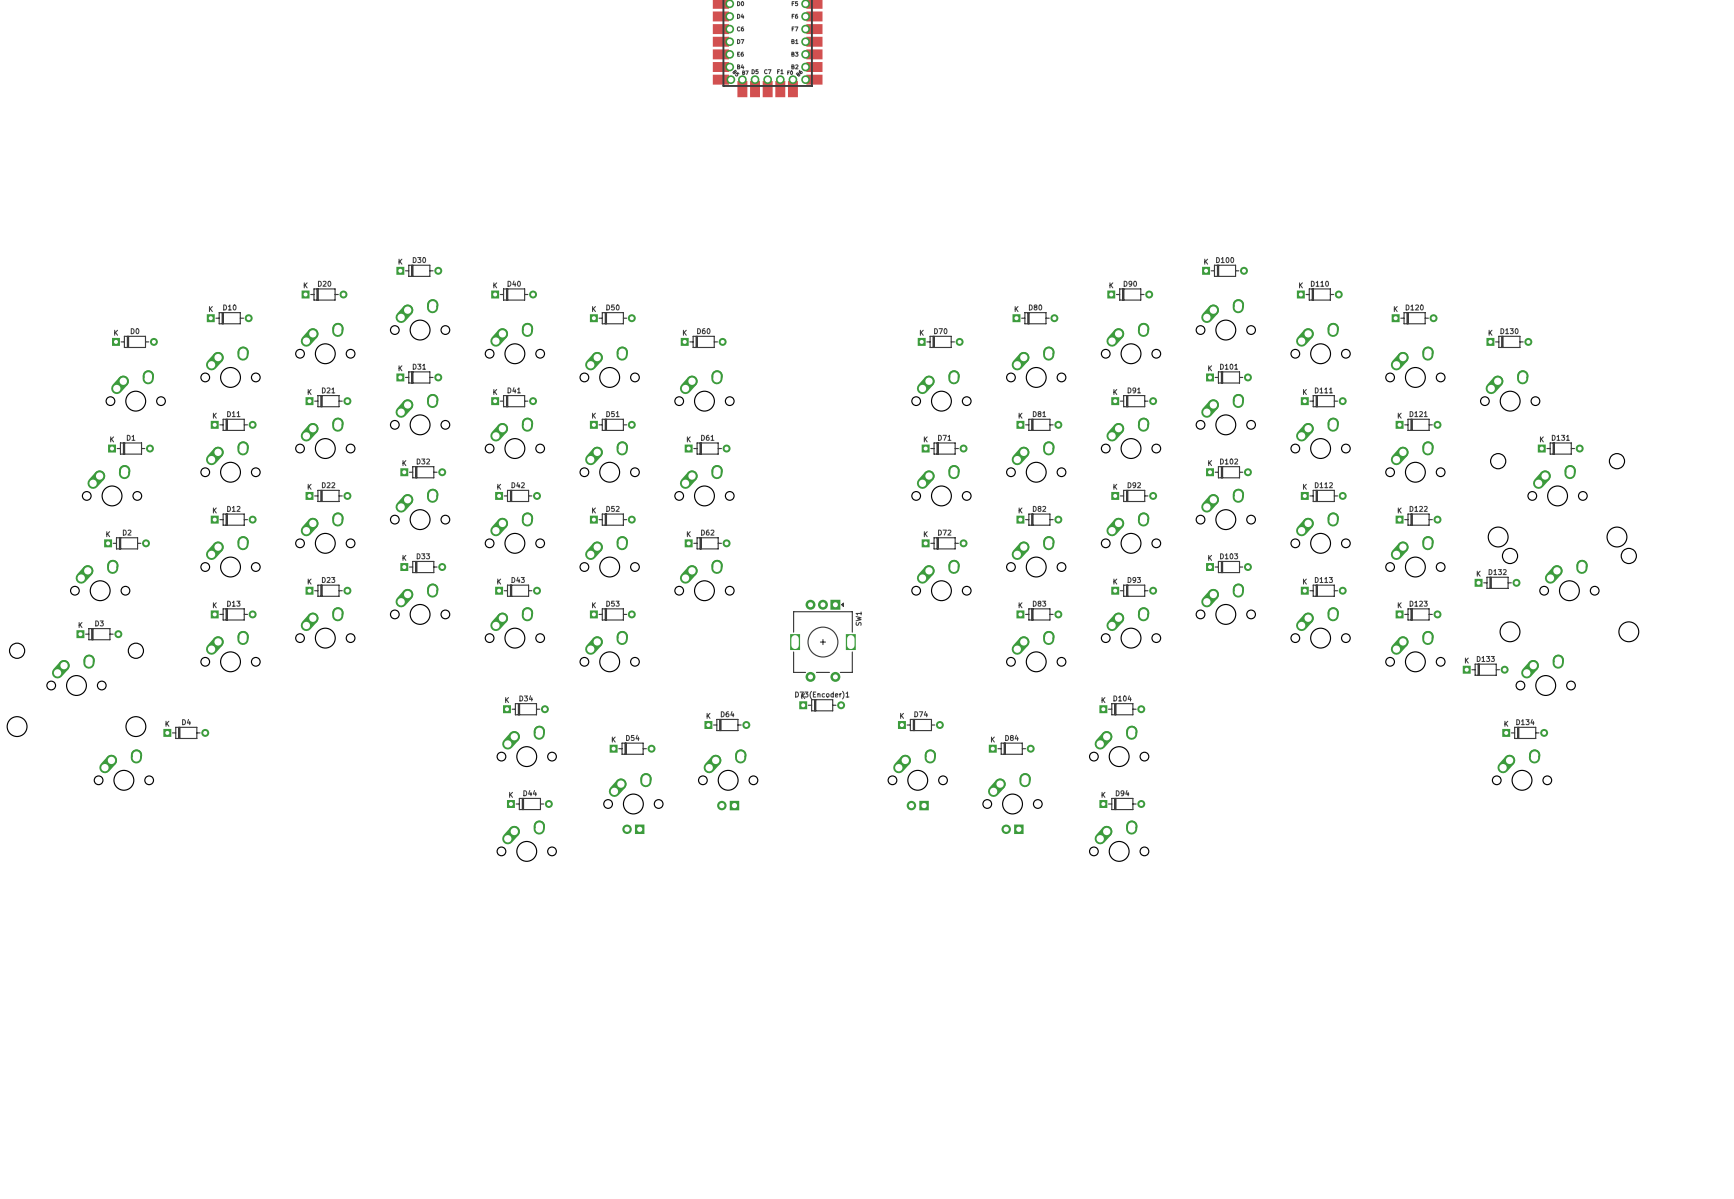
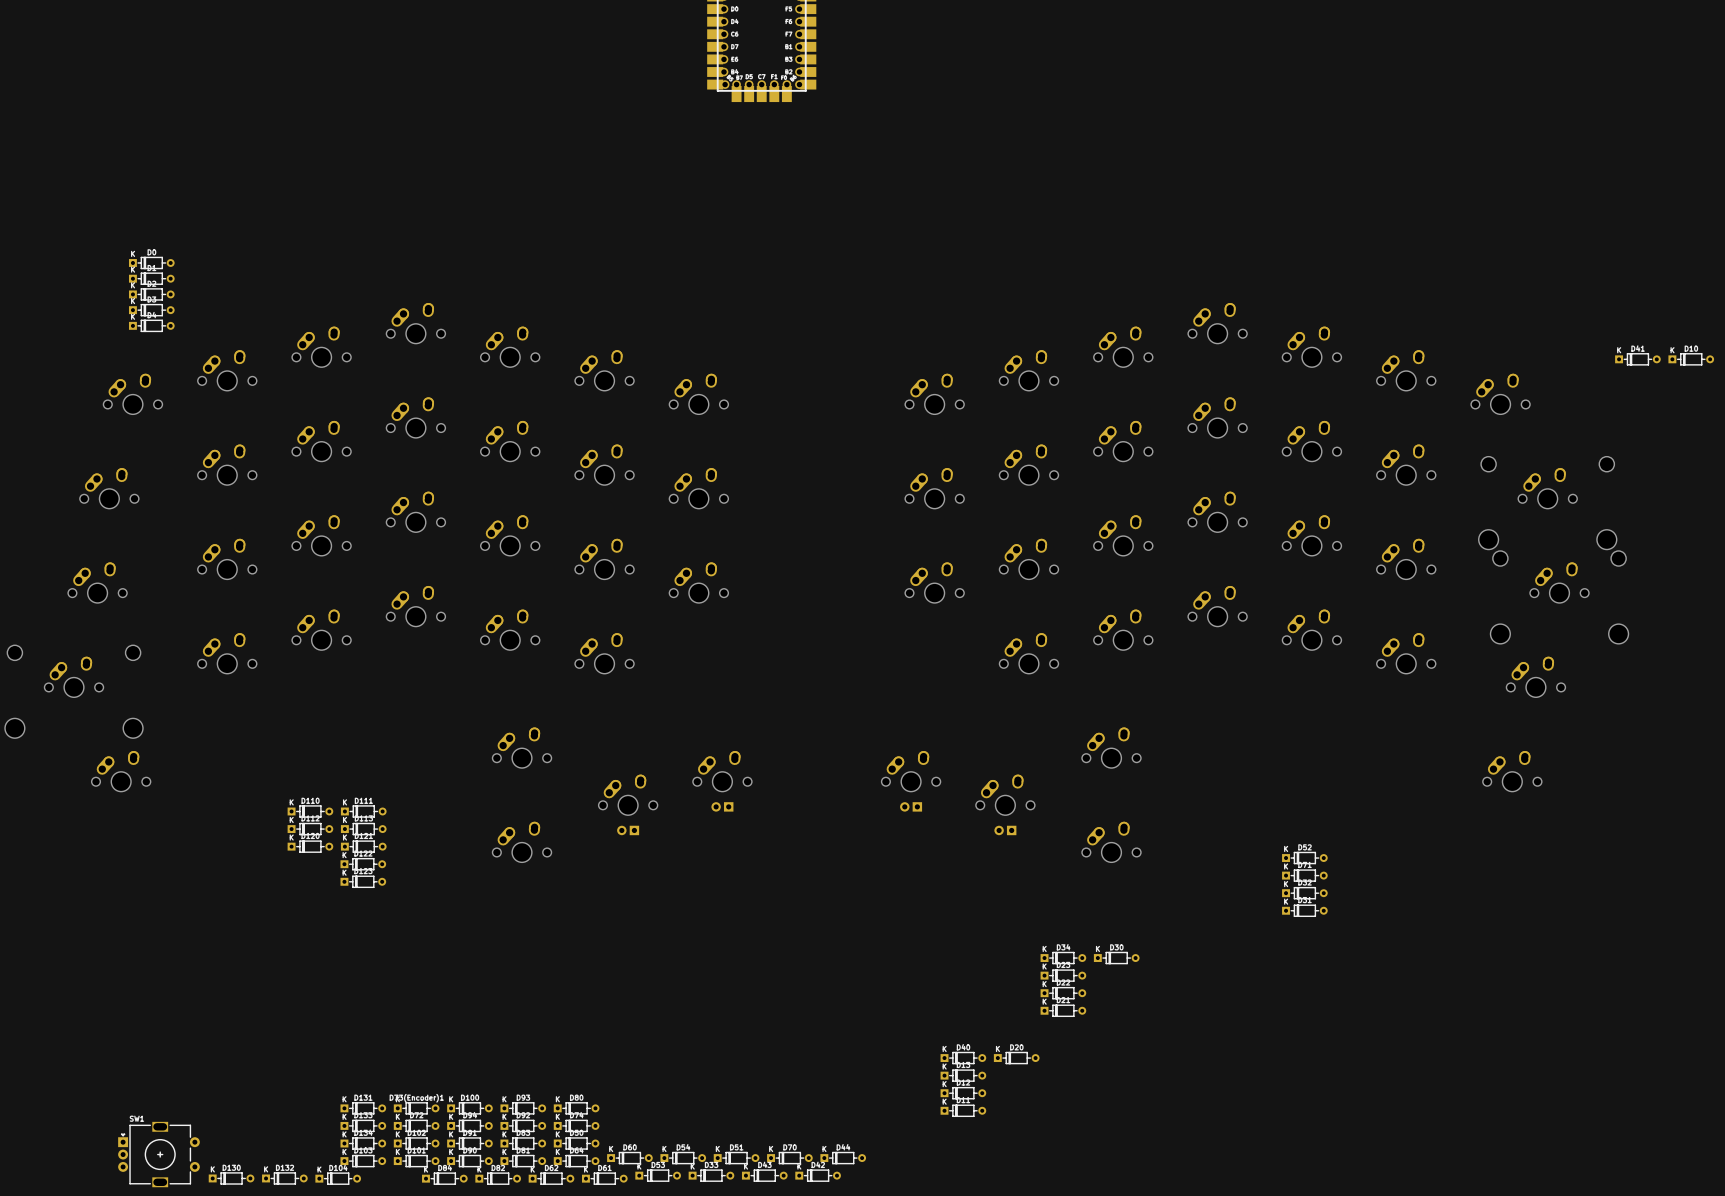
part position: (419, 270) -> (1116, 958)
part position: (1225, 270) -> (469, 1108)
part position: (324, 294) -> (1016, 1058)
part position: (514, 294) -> (963, 1058)
part position: (1130, 294) -> (469, 1161)
part position: (1319, 294) -> (310, 811)
part position: (229, 318) -> (1691, 359)
part position: (612, 318) -> (576, 1143)
part position: (1035, 318) -> (576, 1108)
part position: (1414, 318) -> (310, 846)
part position: (134, 341) -> (151, 262)
part position: (703, 341) -> (629, 1158)
part position: (940, 341) -> (789, 1158)
part position: (1509, 341) -> (231, 1178)
part position: (419, 377) -> (1304, 910)
part position: (1228, 377) -> (416, 1161)
part position: (328, 401) -> (1063, 1010)
part position: (514, 401) -> (1637, 359)
part position: (1134, 401) -> (469, 1143)
part position: (1323, 401) -> (363, 811)
part position: (233, 424) -> (963, 1110)
part position: (612, 424) -> (736, 1158)
part position: (1039, 424) -> (523, 1161)
part position: (1418, 424) -> (363, 846)
part position: (130, 448) -> (151, 278)
part position: (707, 448) -> (604, 1178)
part position: (944, 448) -> (1304, 875)
part position: (1560, 448) -> (363, 1108)
part position: (423, 472) -> (1304, 893)
part position: (1228, 472) -> (416, 1143)
part position: (328, 495) -> (1063, 993)
part position: (518, 495) -> (818, 1175)
part position: (1134, 495) -> (523, 1125)
part position: (1323, 495) -> (310, 829)
part position: (233, 519) -> (963, 1093)
part position: (612, 519) -> (1304, 858)
part position: (1039, 519) -> (498, 1178)
part position: (1418, 519) -> (363, 864)
part position: (127, 543) -> (151, 294)
part position: (707, 543) -> (551, 1178)
part position: (944, 543) -> (416, 1125)
part position: (423, 567) -> (711, 1175)
part position: (1228, 567) -> (363, 1161)
part position: (1497, 582) -> (284, 1178)
part position: (328, 590) -> (1063, 975)
part position: (518, 590) -> (764, 1175)
part position: (1134, 590) -> (523, 1108)
part position: (1323, 590) -> (363, 829)
part position: (233, 614) -> (963, 1075)
part position: (612, 614) -> (658, 1175)
part position: (1039, 614) -> (523, 1143)
part position: (1418, 614) -> (363, 881)
part position: (99, 634) -> (151, 310)
part rotation: 0° (822, 640) -> 90° counterclockwise (158, 1154)
part position: (822, 640) -> (158, 1154)
part position: (1485, 669) -> (363, 1125)
part position: (822, 705) -> (416, 1108)
part position: (525, 709) -> (1063, 958)
part position: (1122, 709) -> (338, 1178)
part position: (727, 725) -> (576, 1161)
part position: (920, 725) -> (576, 1125)
part position: (186, 732) -> (151, 325)
part position: (1525, 732) -> (363, 1143)
part position: (632, 748) -> (683, 1158)
part position: (1011, 748) -> (444, 1178)
part position: (529, 804) -> (843, 1158)
part position: (1122, 804) -> (469, 1125)

